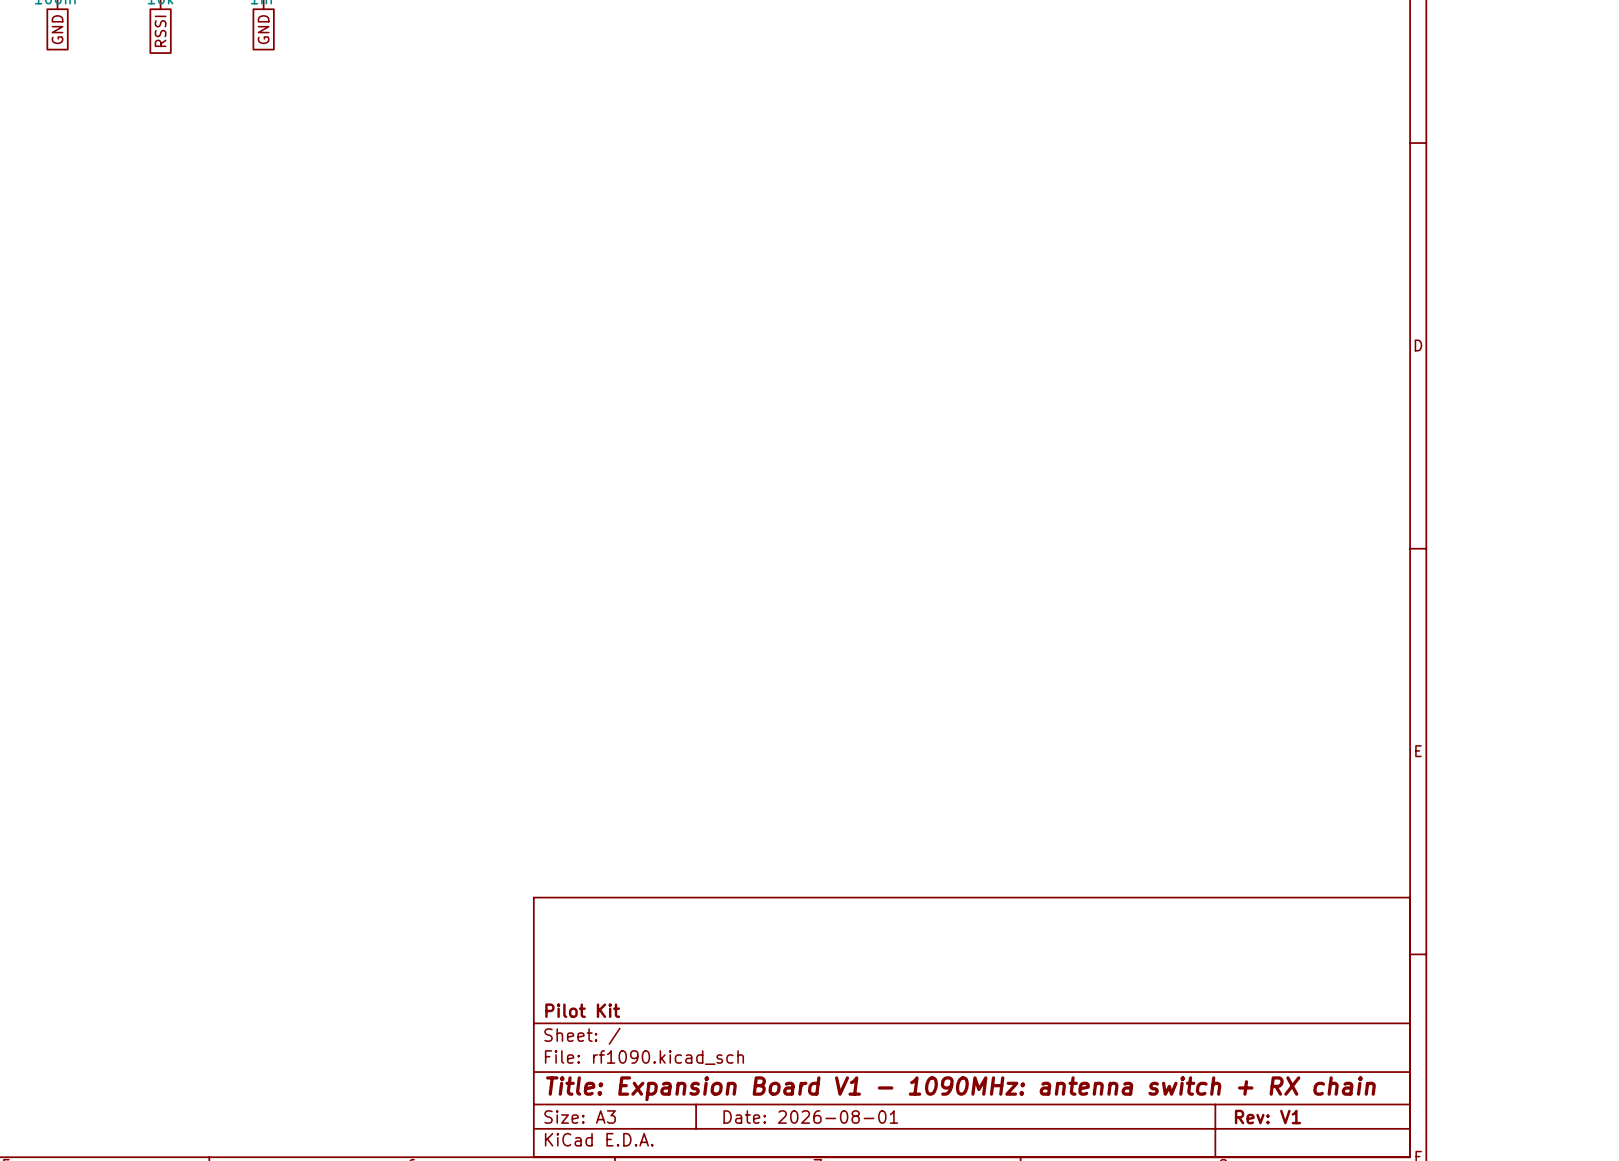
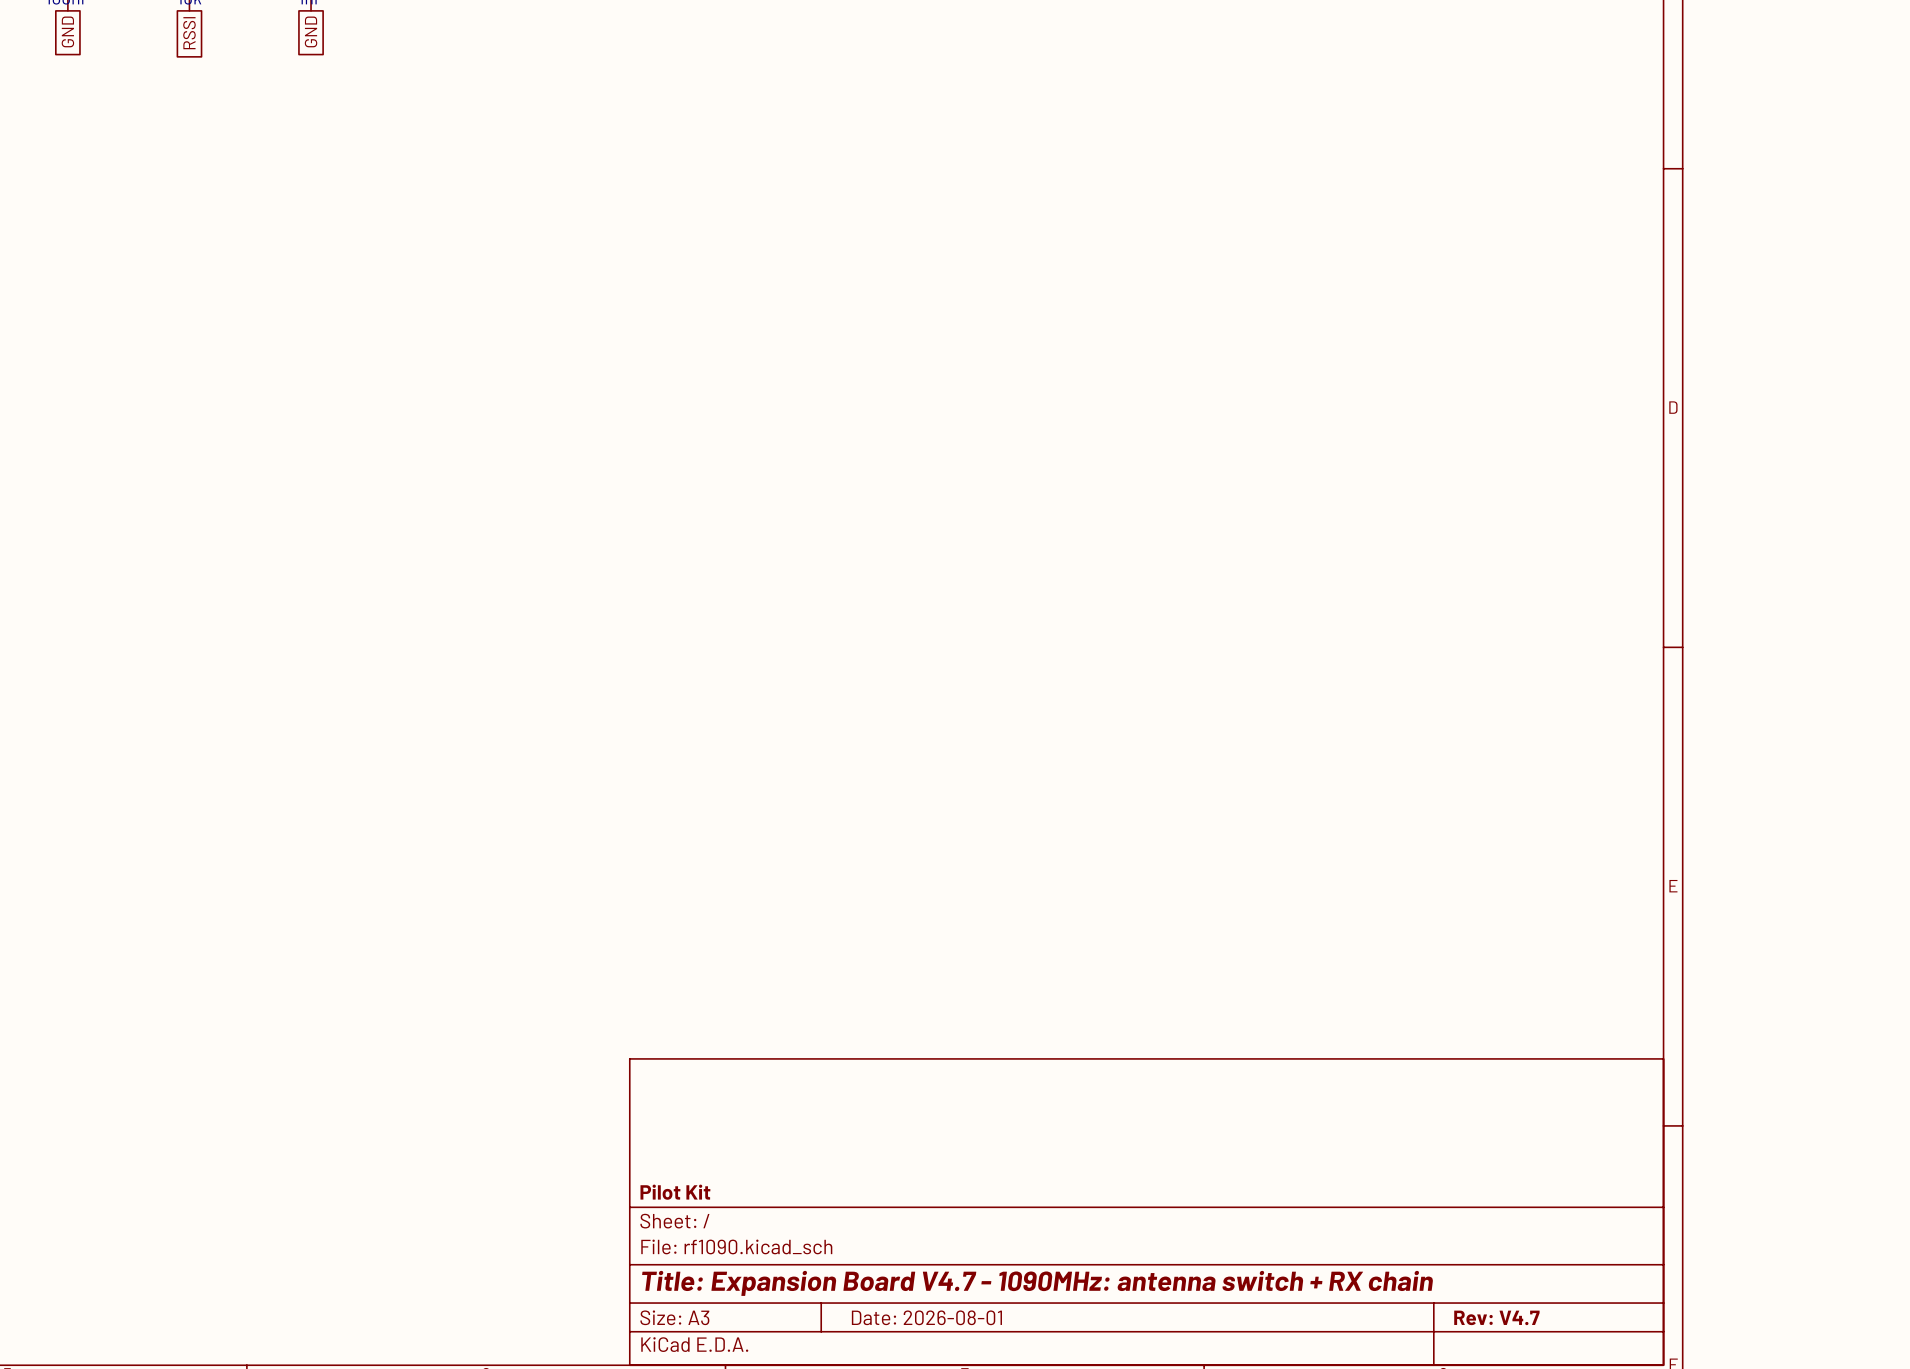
title block: Title: Expansion Board V1 - 1090MHz: antenna switch + RX chain (960, 1088) -> Title: Expansion Board V4.7 - 1090MHz: antenna switch + RX chain (1037, 1283)
title block: Rev: V1 (1267, 1117) -> Rev: V4.7 (1496, 1317)

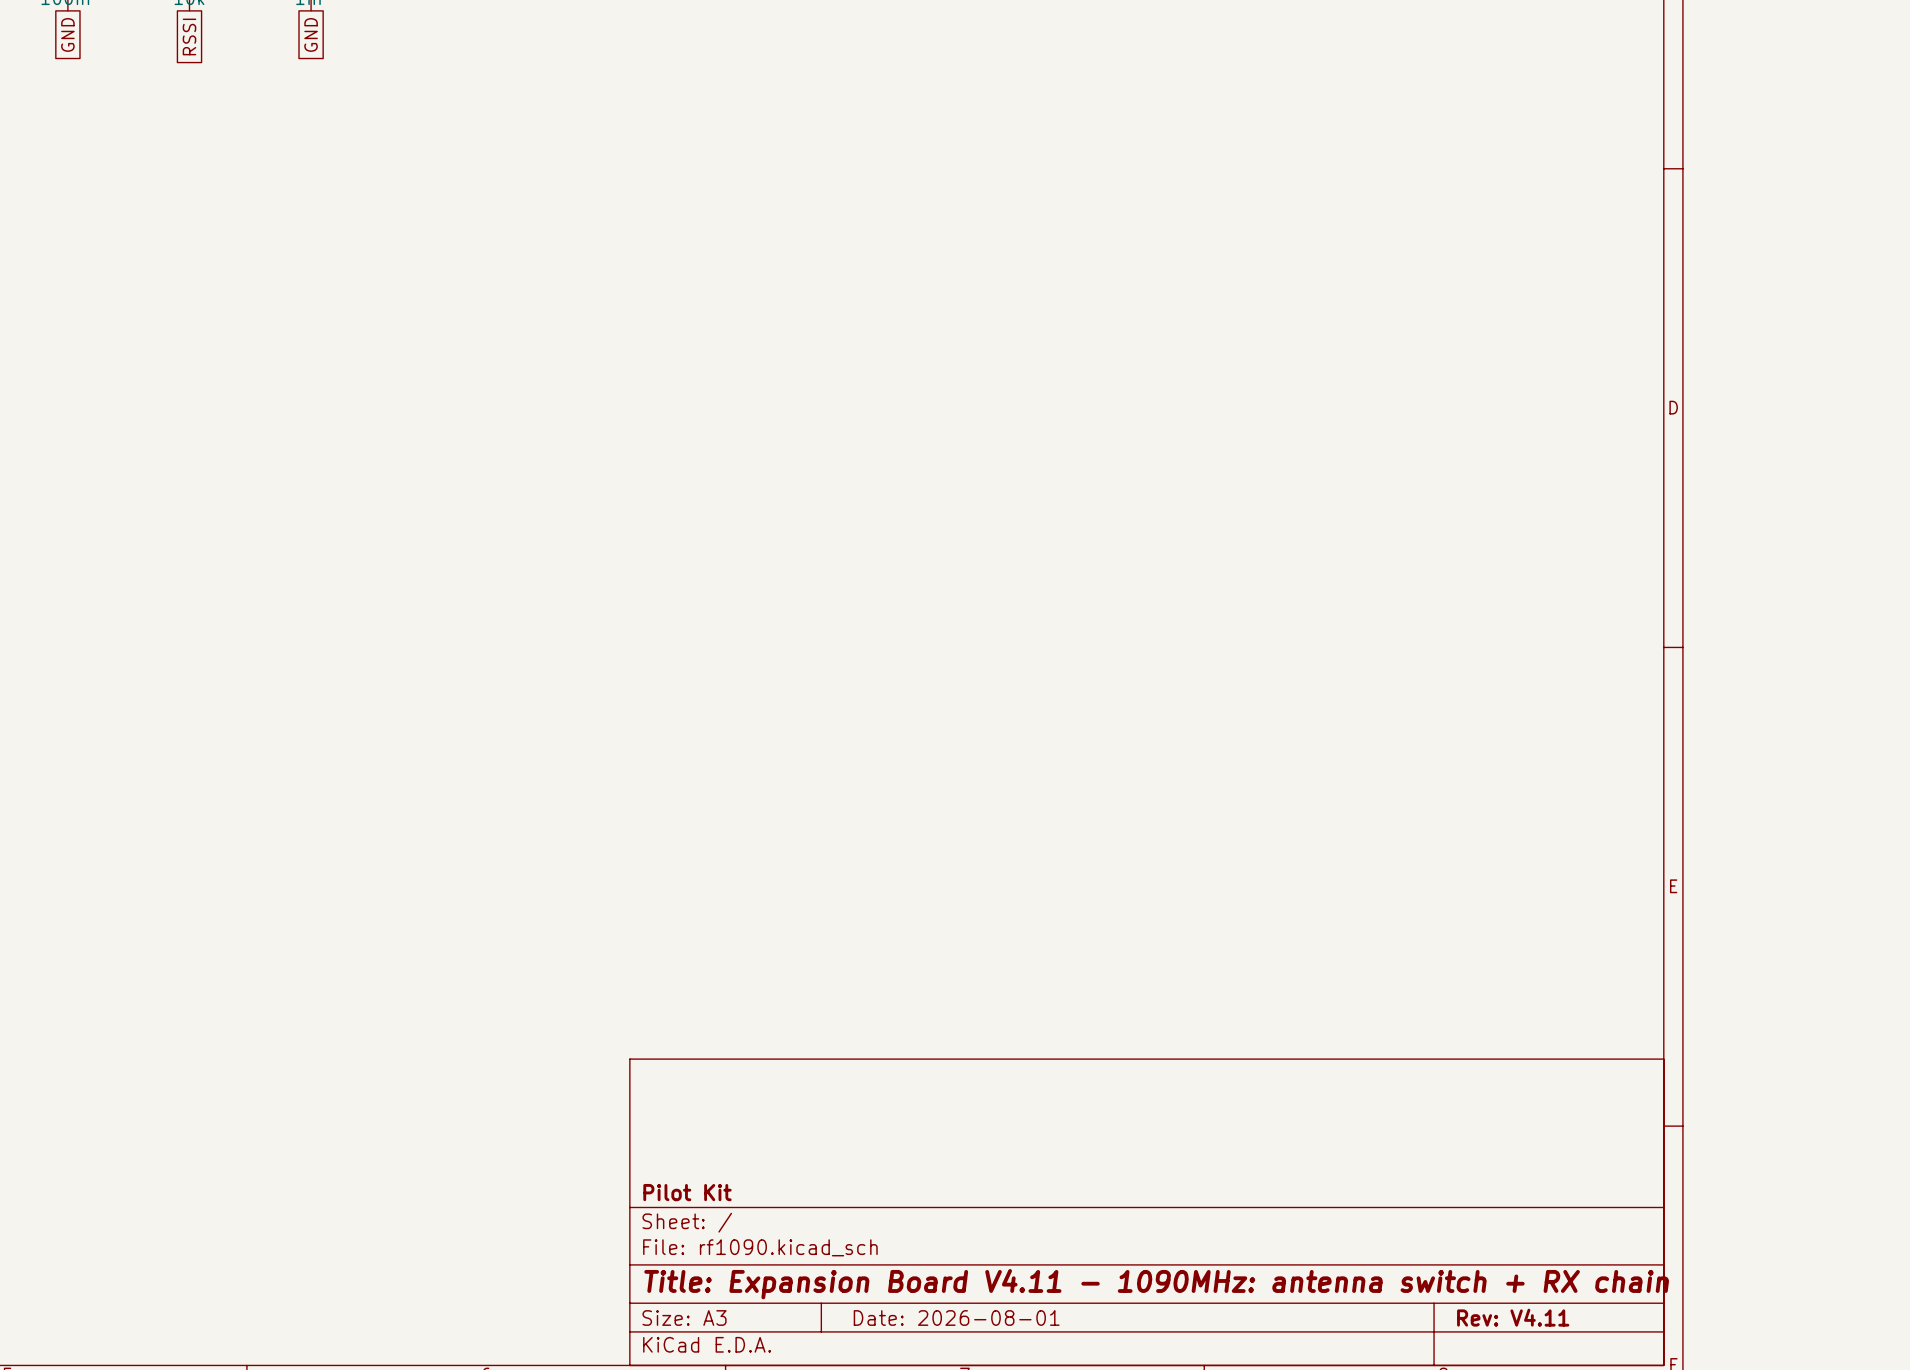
title block: Title: Expansion Board V4.7 - 1090MHz: antenna switch + RX chain (1037, 1283) -> Title: Expansion Board V4.11 - 1090MHz: antenna switch + RX chain (1156, 1284)
title block: Rev: V4.7 (1496, 1317) -> Rev: V4.11 (1513, 1317)

